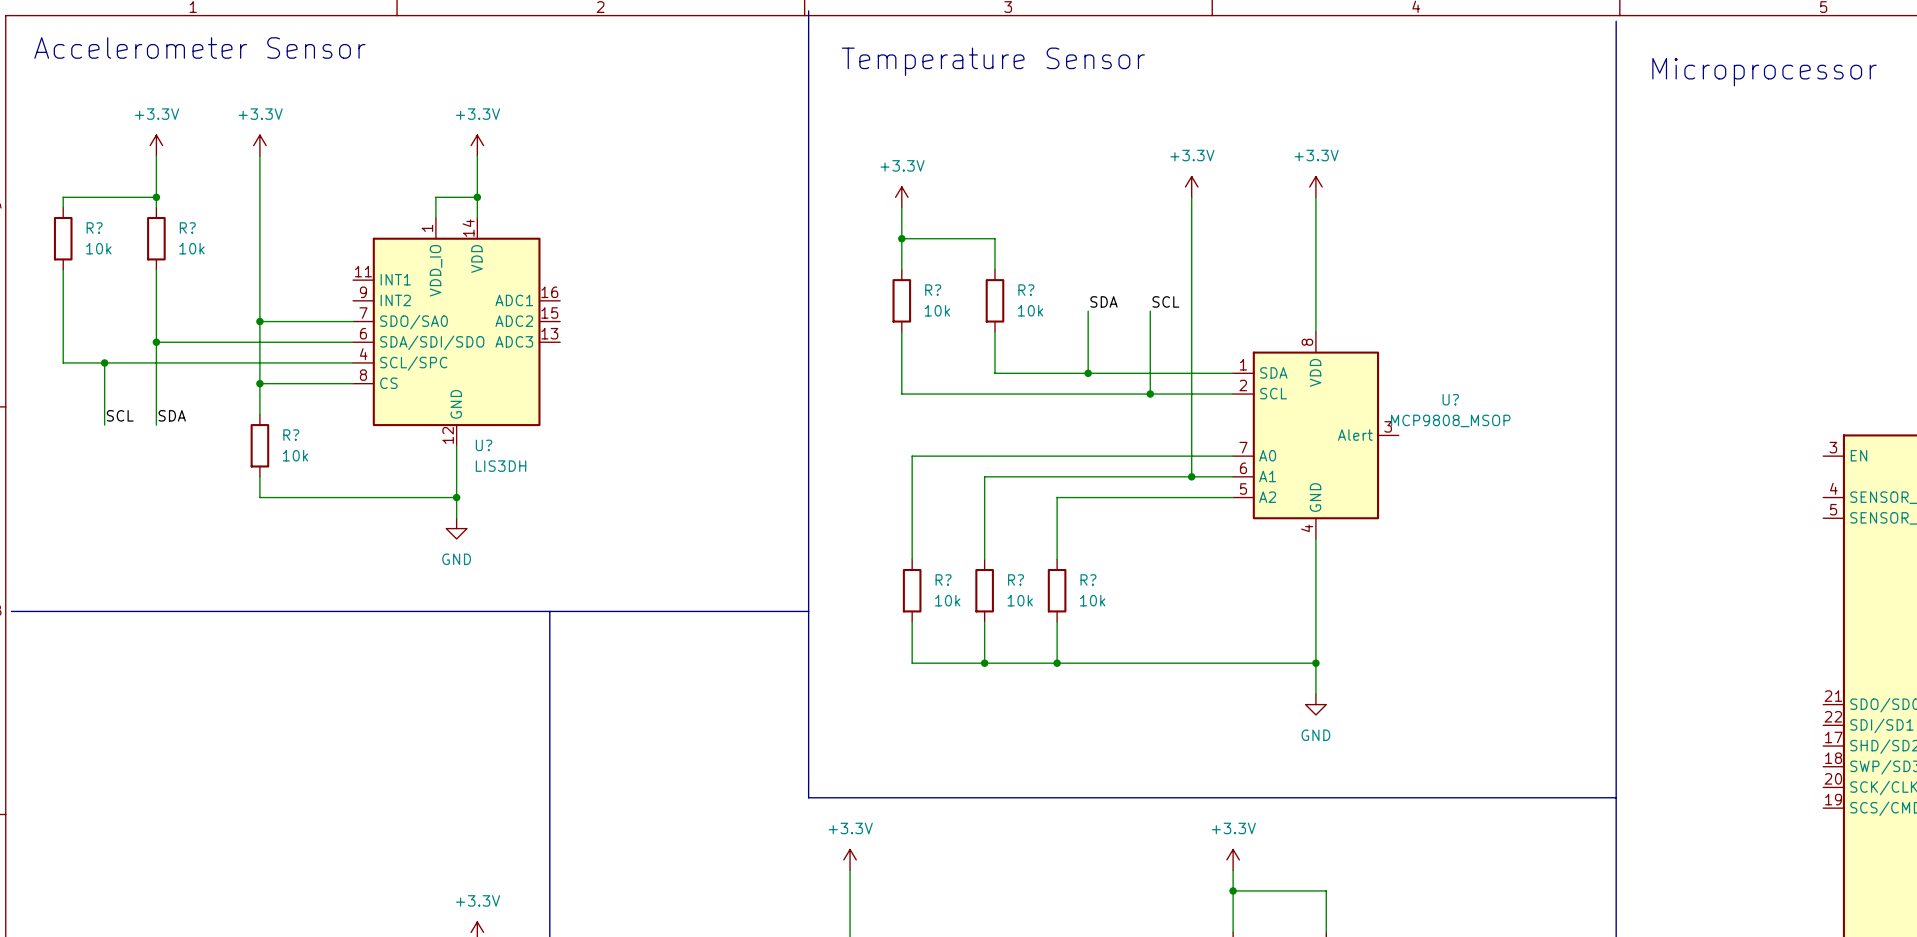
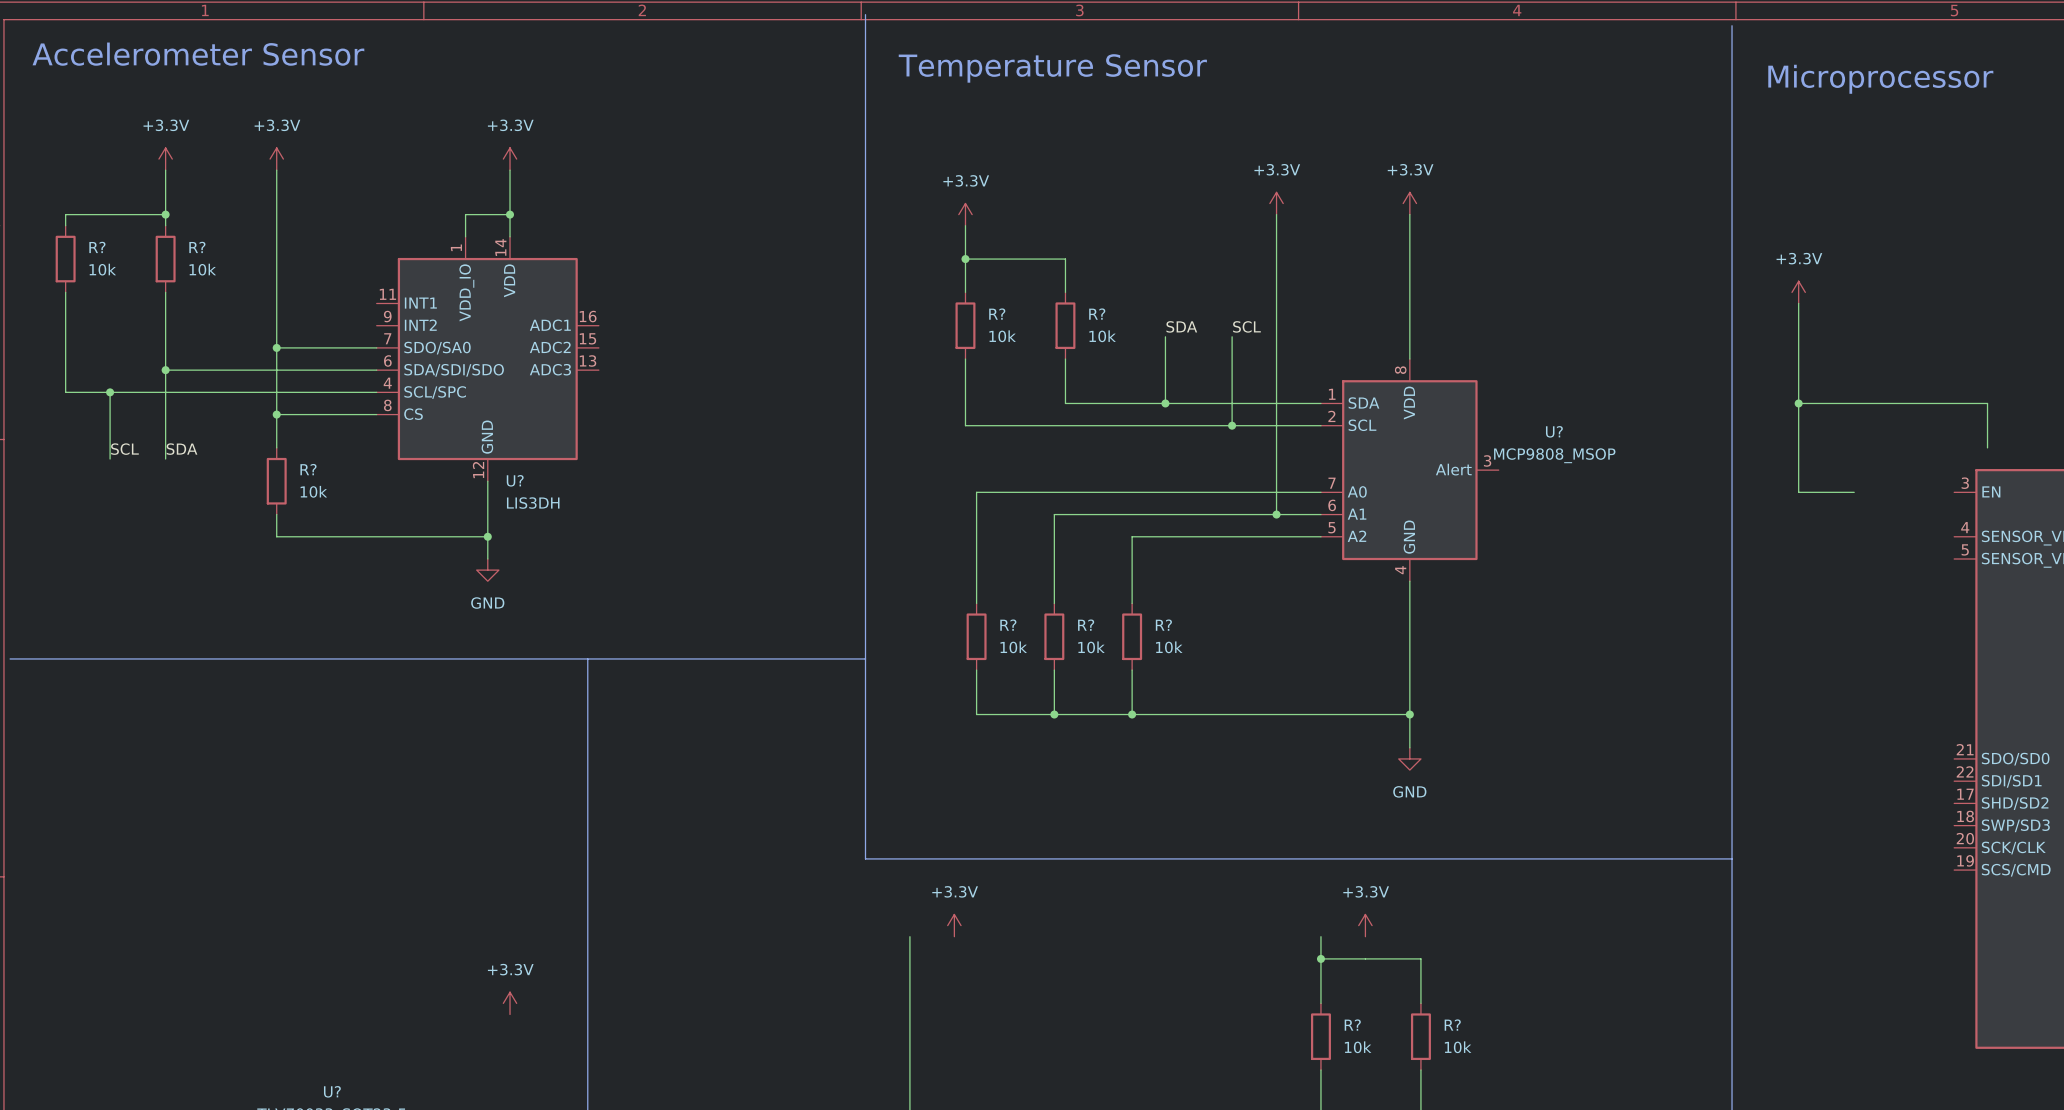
power symbol: none -> +3.3V (1798, 292)
wire: none -> (1798, 303) (1798, 492) (1854, 492)
wire: none -> (1798, 403) (1987, 403) (1987, 447)
junction: none -> (1798, 403)
power symbol position: +3.3V (850, 859) -> +3.3V (954, 925)
power symbol position: +3.3V (1233, 859) -> +3.3V (1365, 925)

